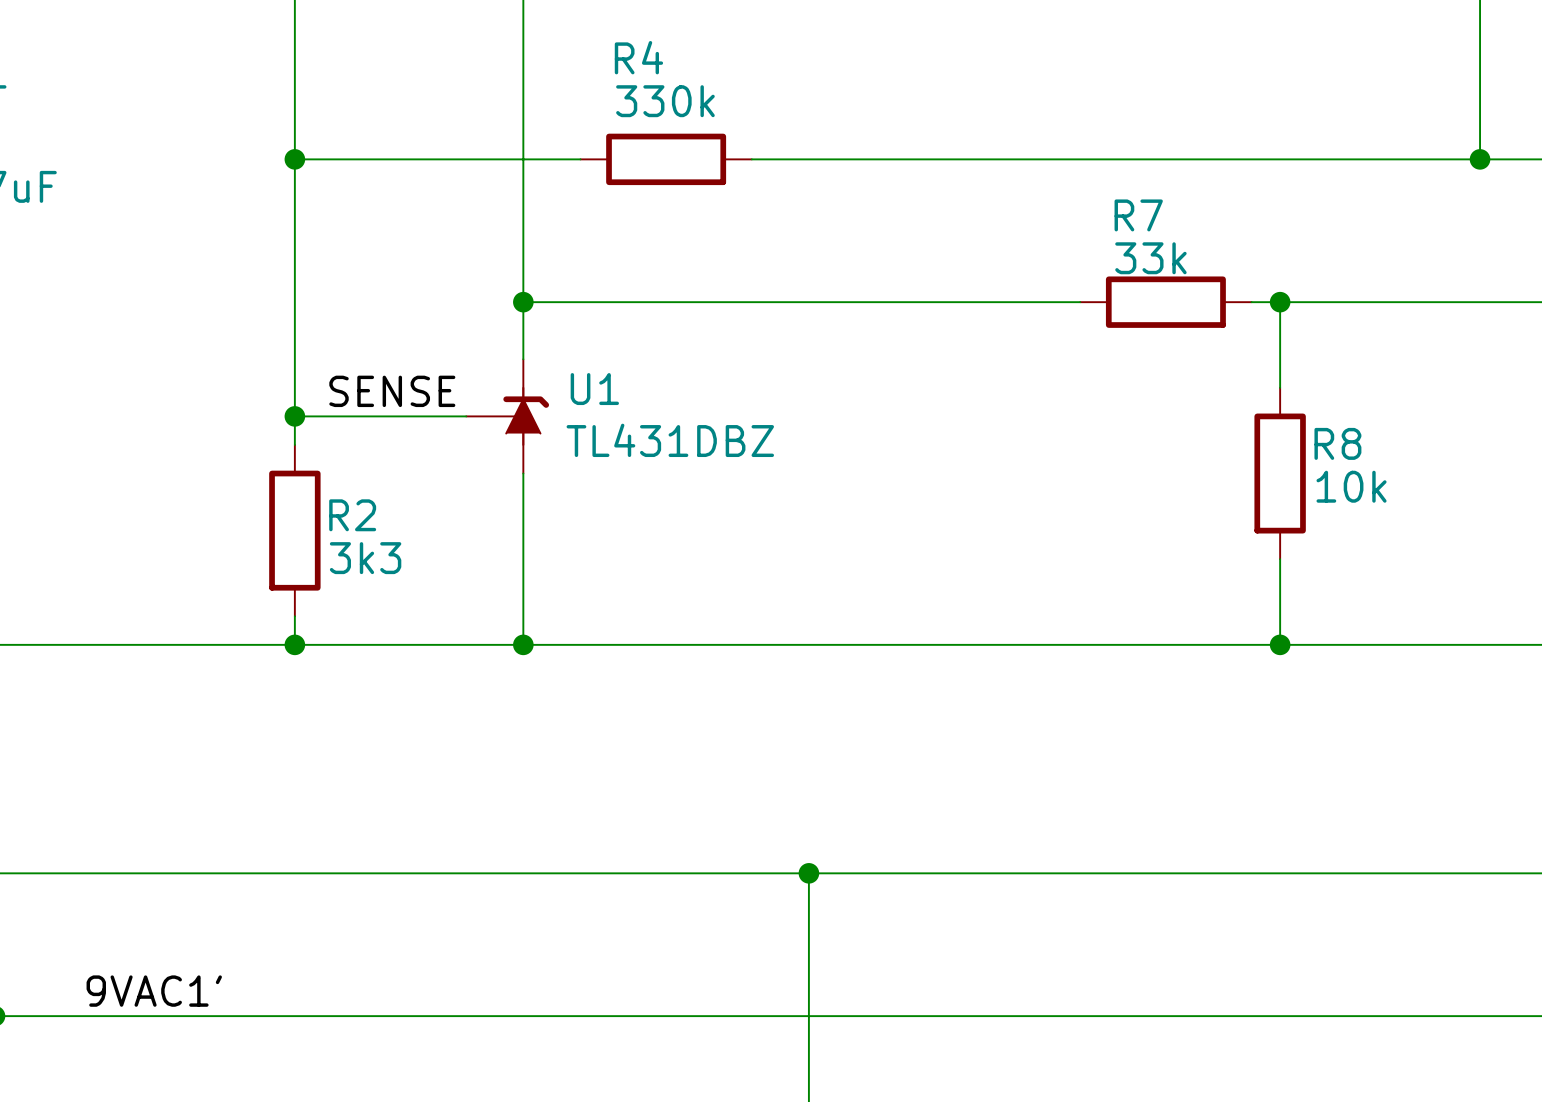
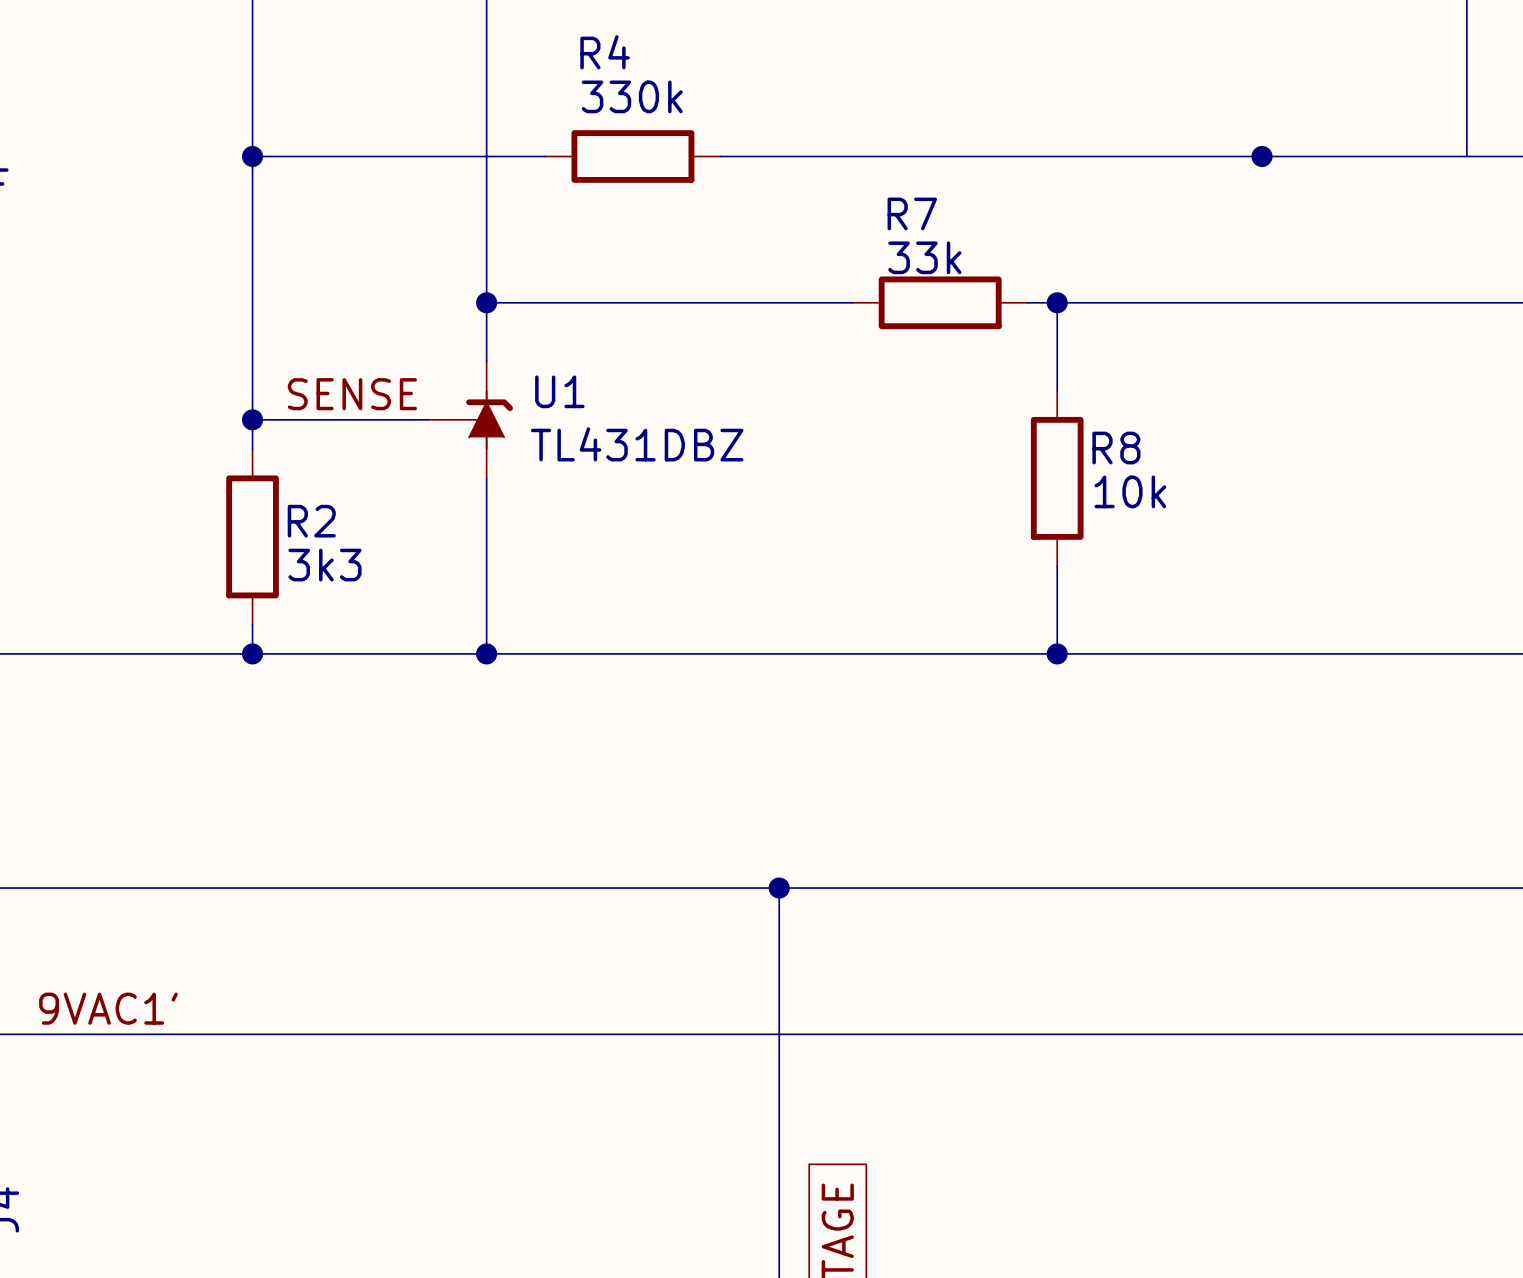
junction: none -> (1262, 156)
junction: (1480, 159) -> none
wire: (880, 302) (1051, 302) -> none
junction: none -> (1057, 302)
R7 position: (1165, 302) -> (940, 302)
wire: none -> (1232, 302) (1057, 302) (1057, 390)
wire: (1280, 302) (1280, 387) -> none
junction: (1280, 302) -> none
R8 position: (1280, 473) -> (1057, 478)
wire: (1280, 559) (1280, 644) -> (1057, 566) (1057, 653)
junction: none -> (1057, 653)
junction: (1280, 644) -> none

